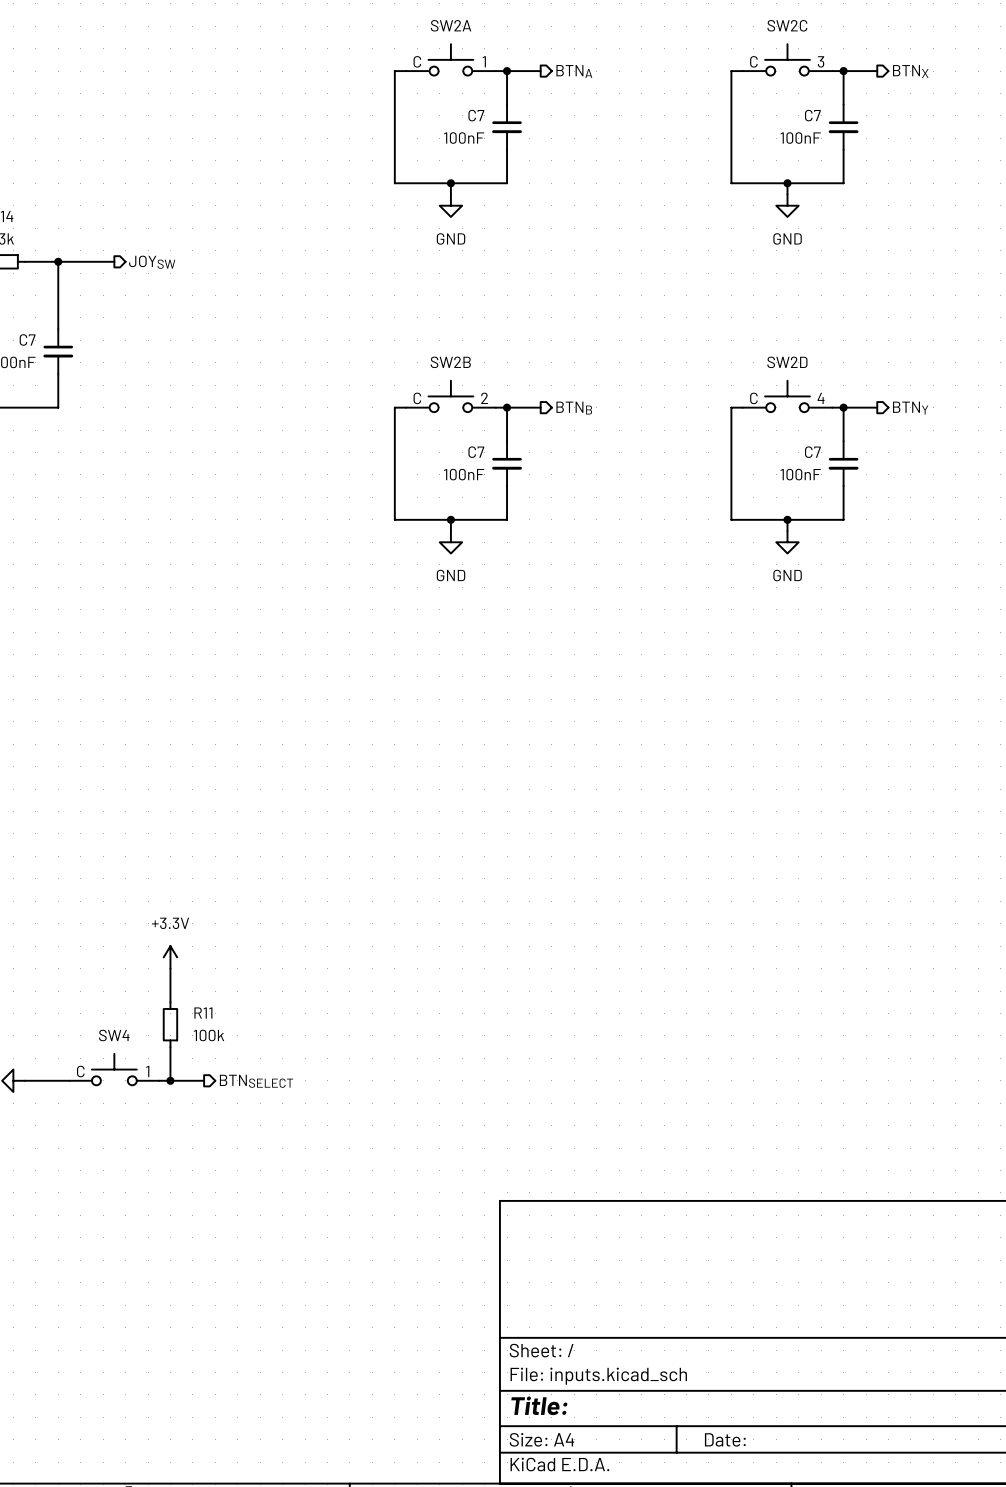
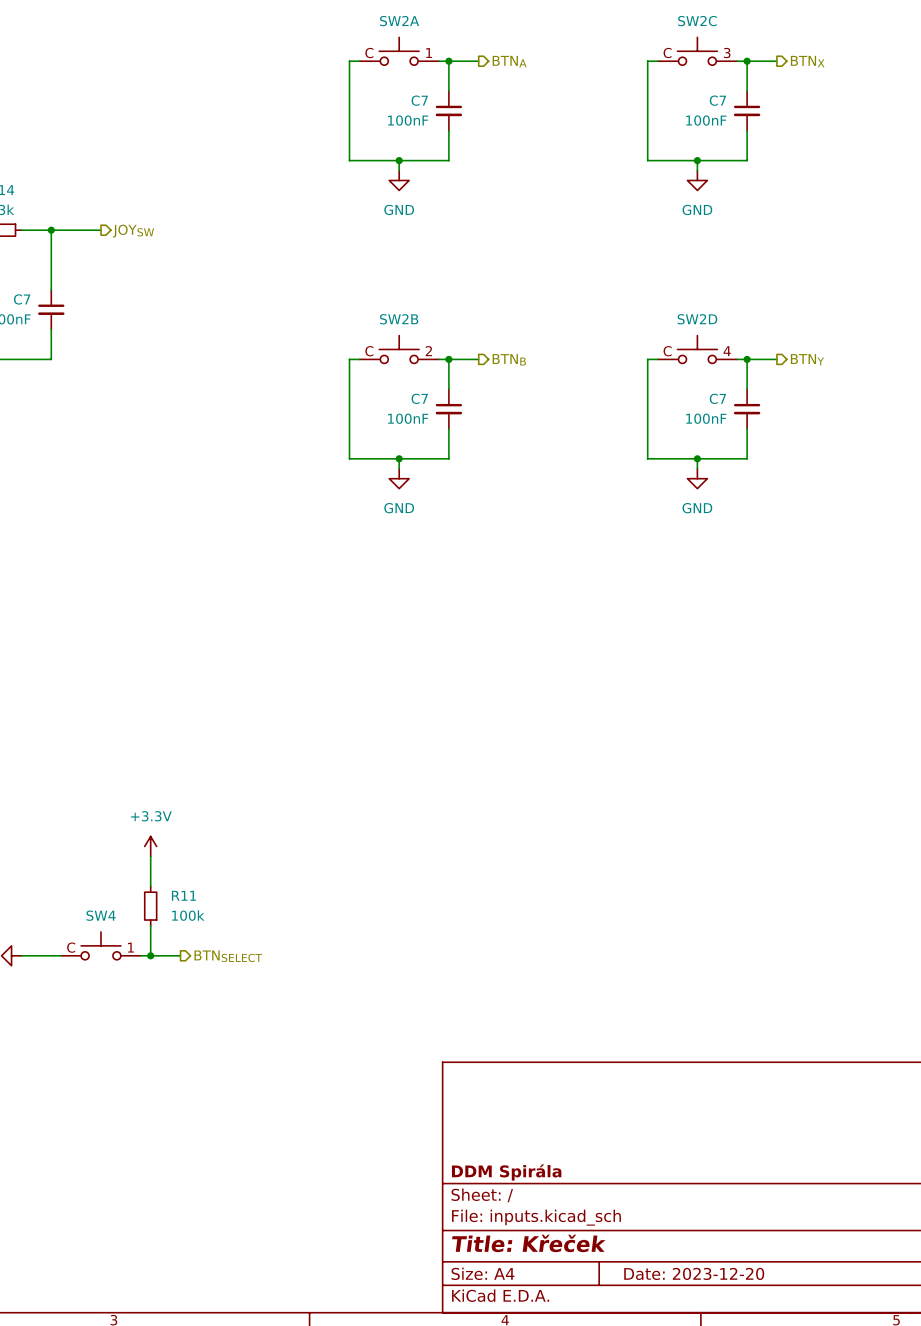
title block: none -> DDM Spirála (506, 1172)
title block: Title: (539, 1405) -> Title: Křeček (528, 1243)
title block: Date: (725, 1439) -> Date: 2023-12-20 (694, 1273)

